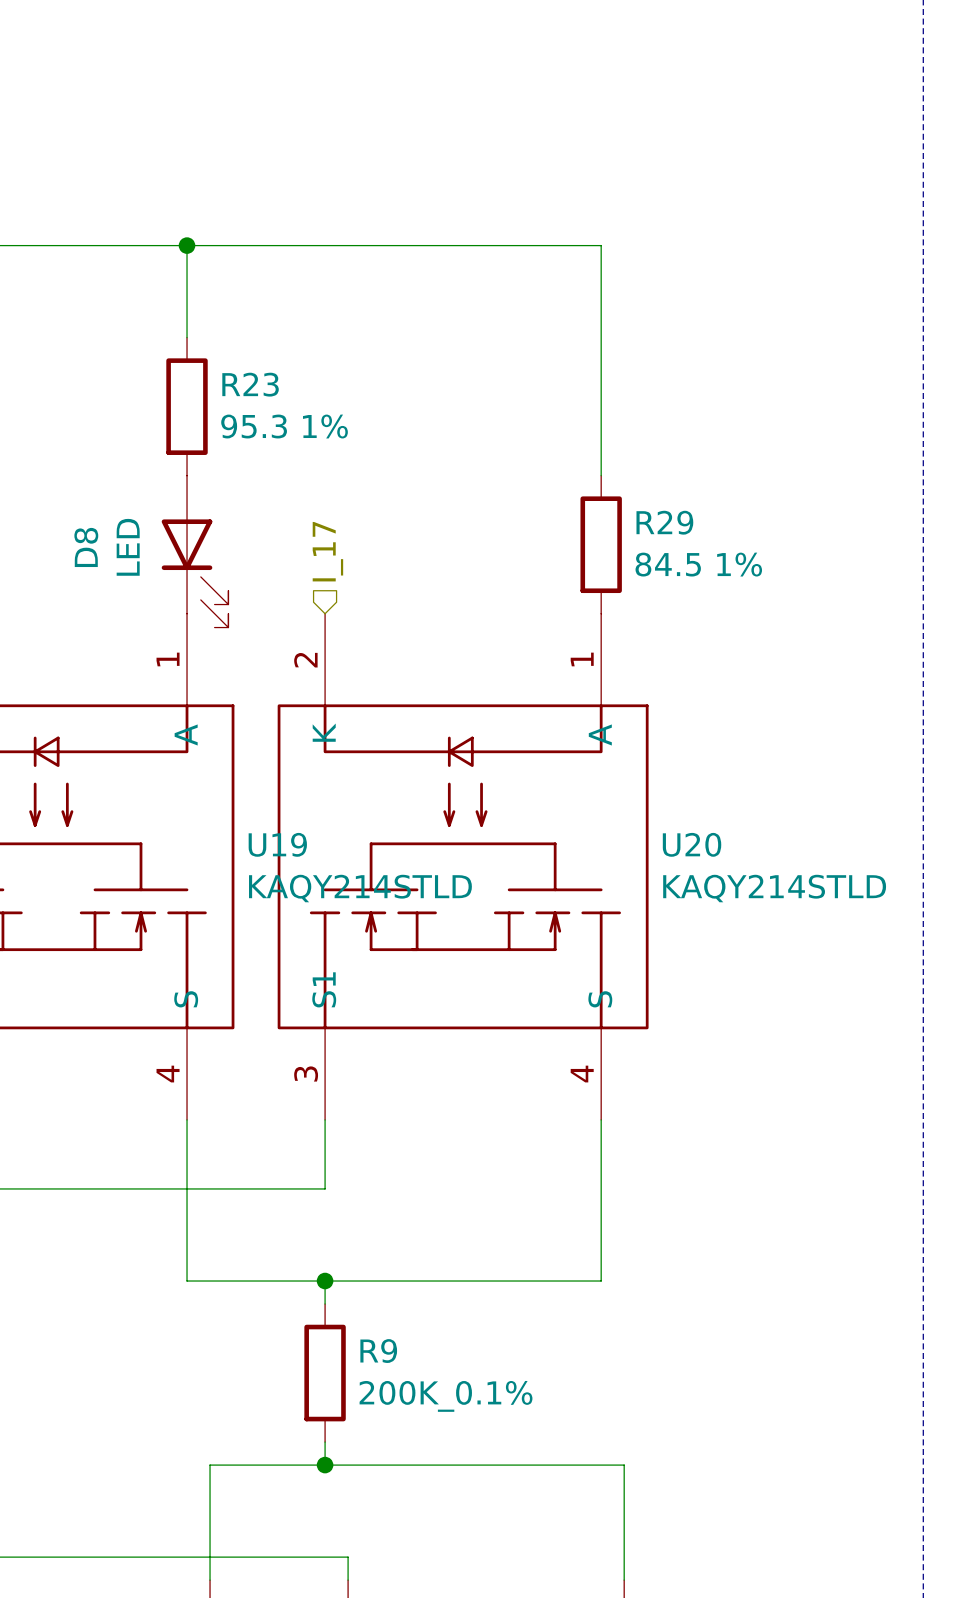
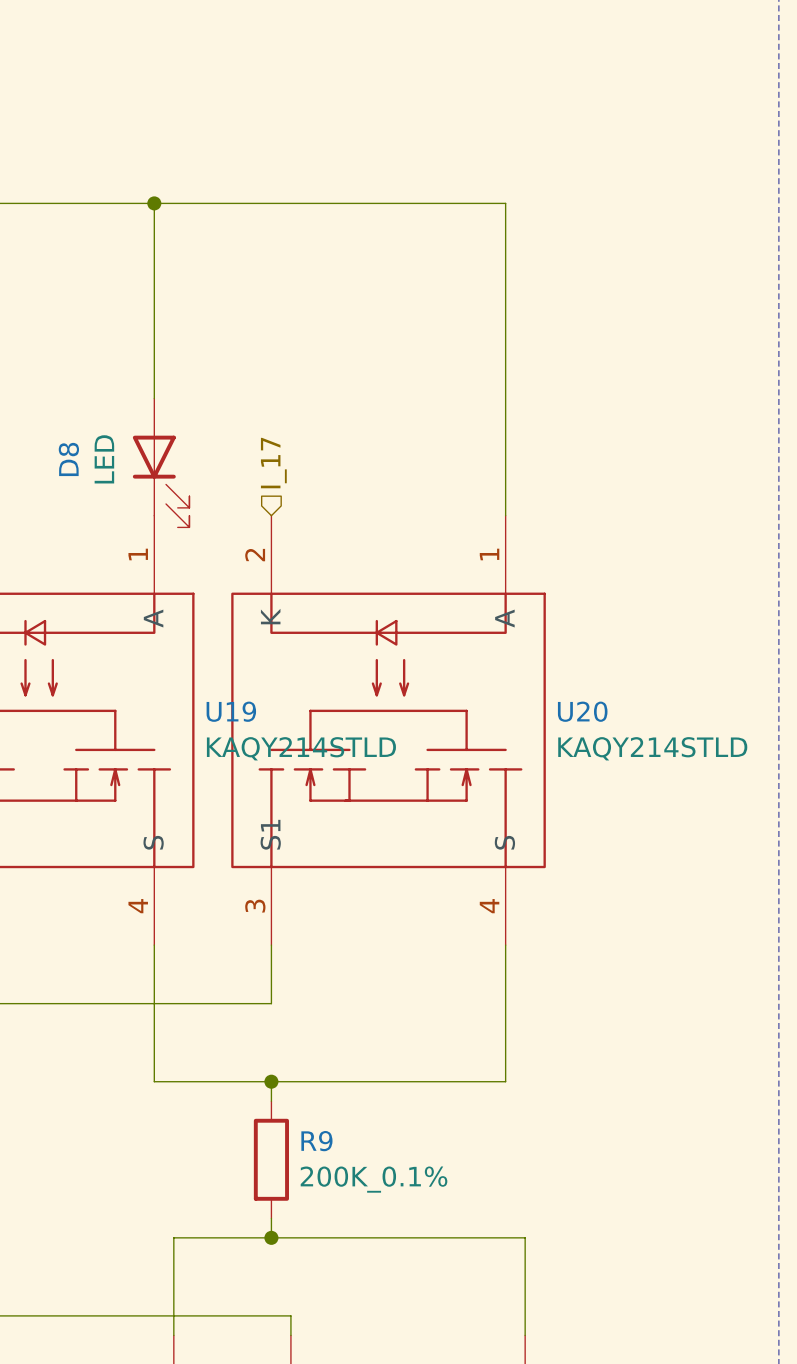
wire: none -> (154, 281) (154, 398)
R23: 95.3 1% (187, 406) -> none
wire: none -> (505, 398) (505, 515)
R29: 84.5 1% (601, 544) -> none

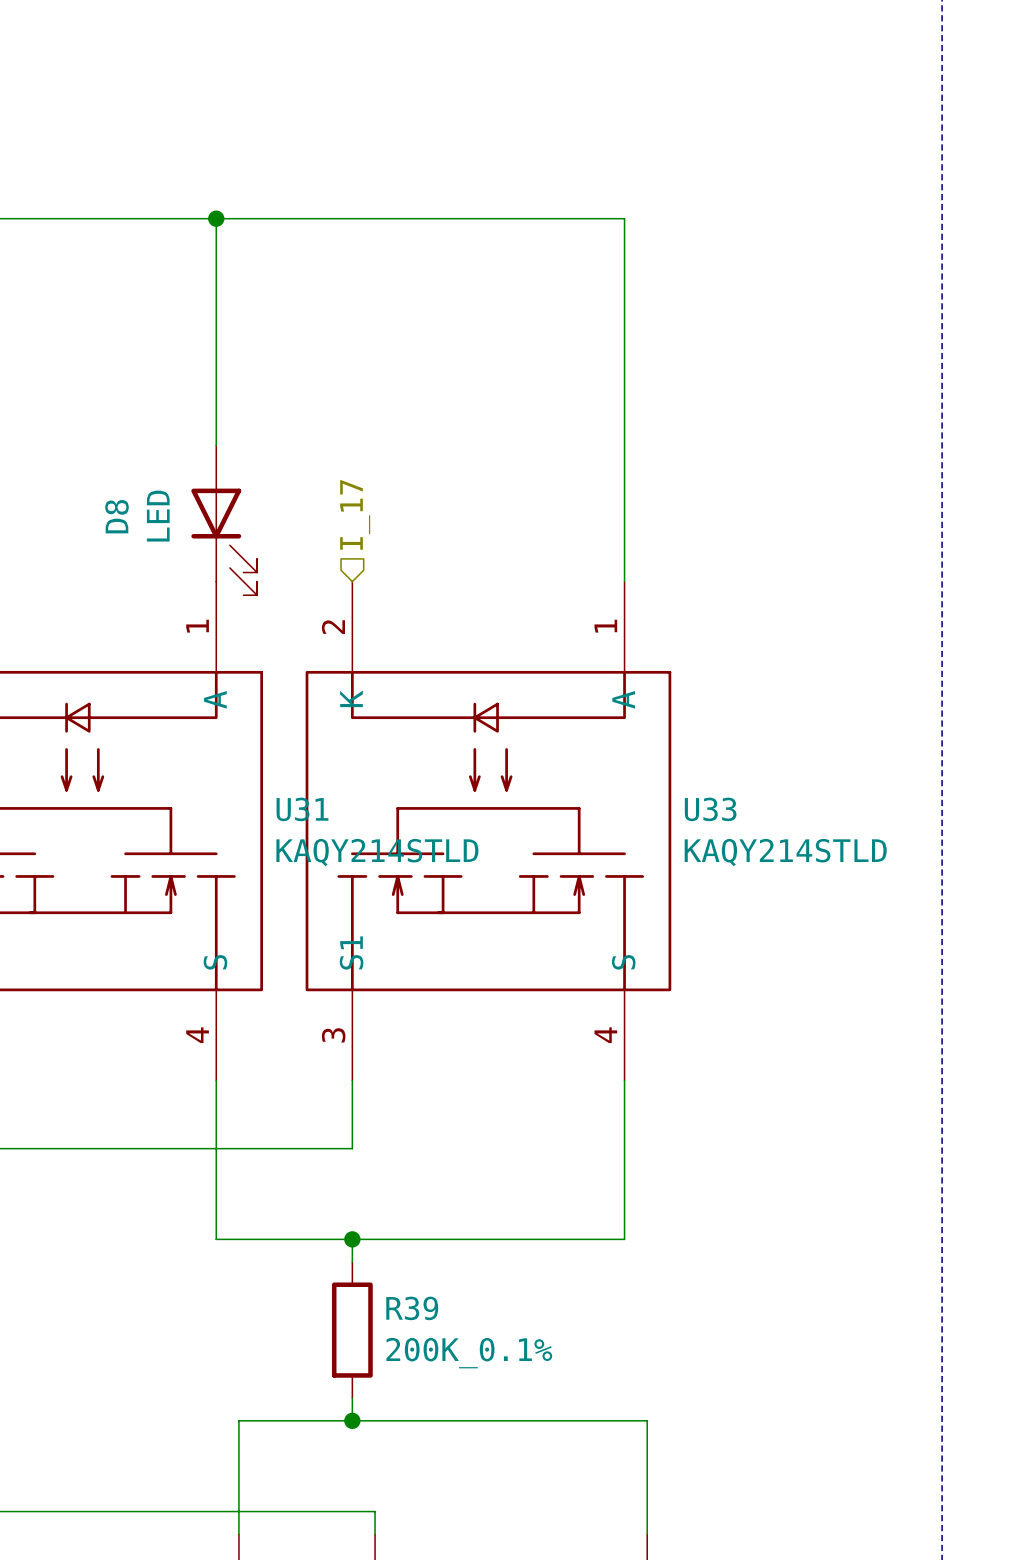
U19 name: U19 (231, 711) -> U31 (302, 809)
U20 name: U20 (582, 711) -> U33 (710, 809)
R9 name: R9 (316, 1141) -> R39 (412, 1308)

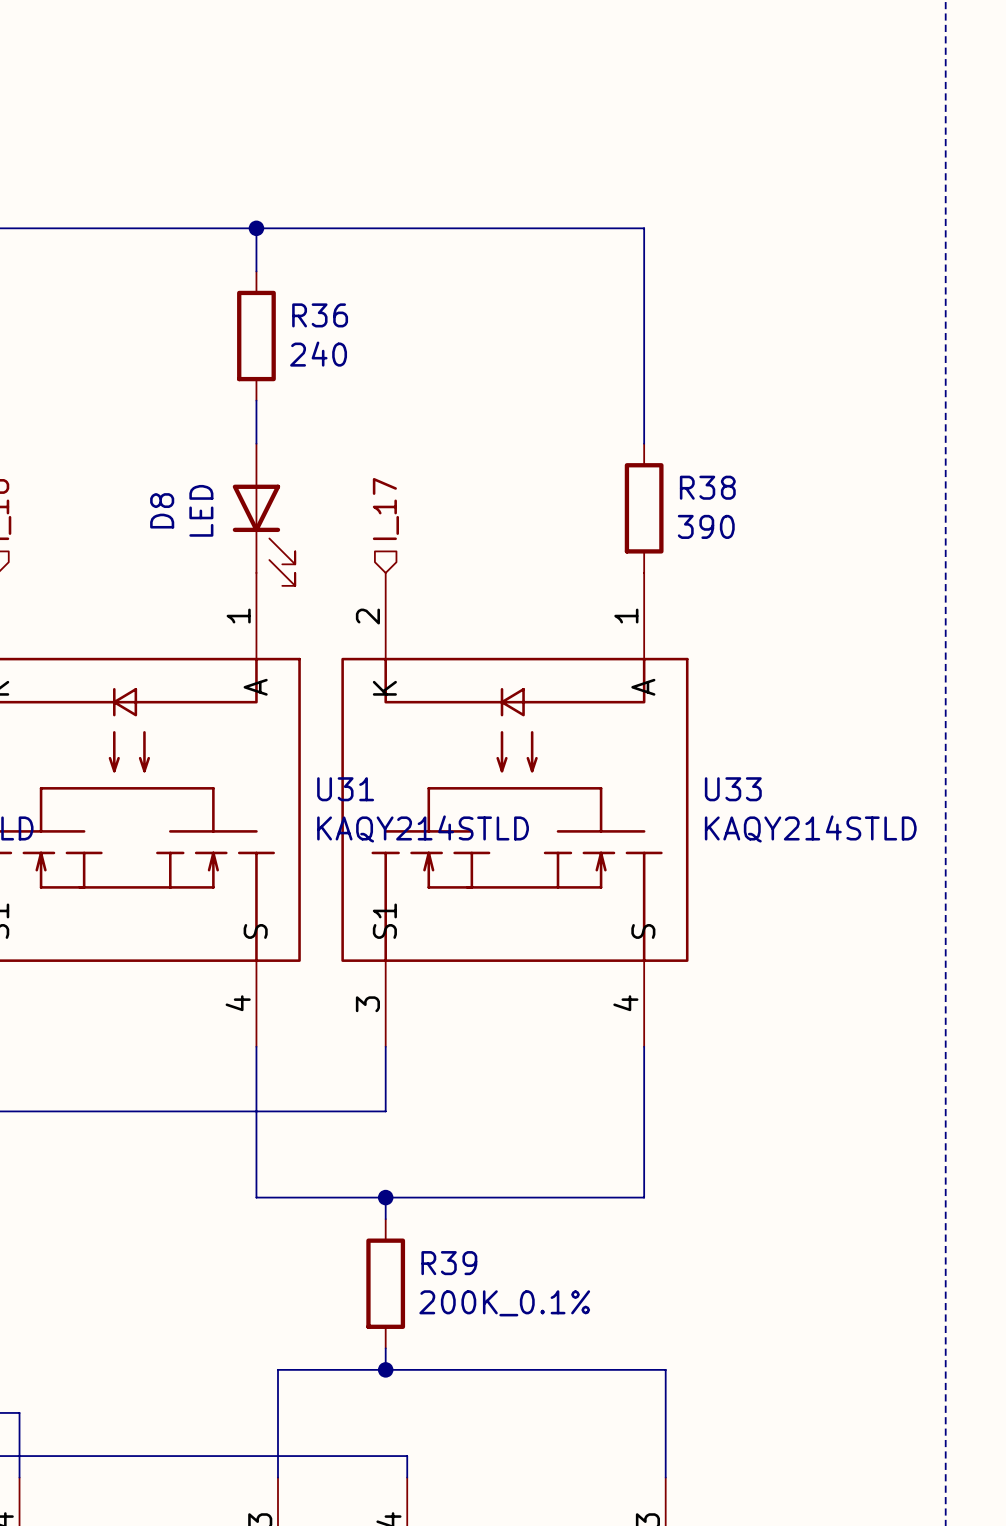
wire: (216, 264) (216, 400) -> none
R36: none -> 240 (256, 336)
wire: (624, 445) (624, 581) -> none
R38: none -> 390 (644, 508)

